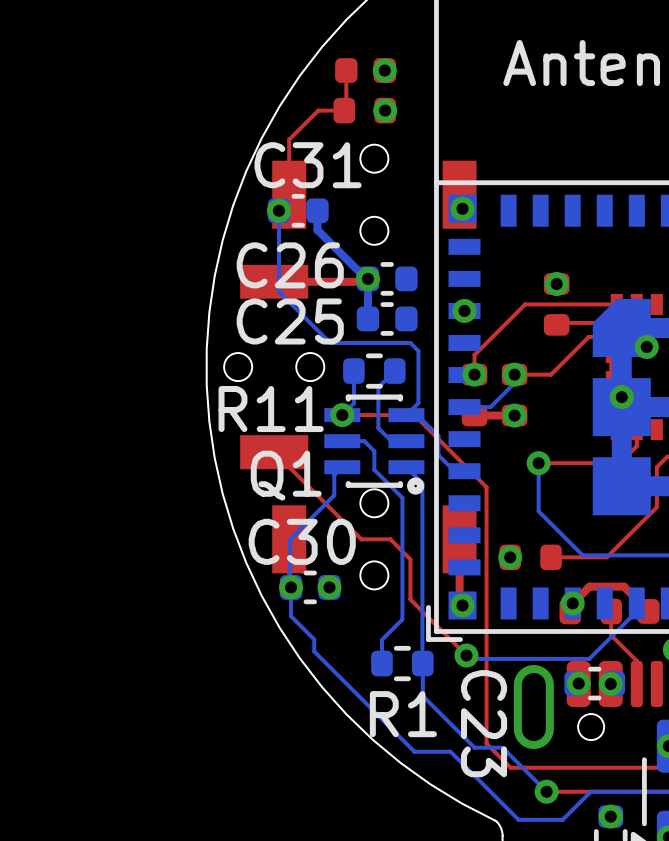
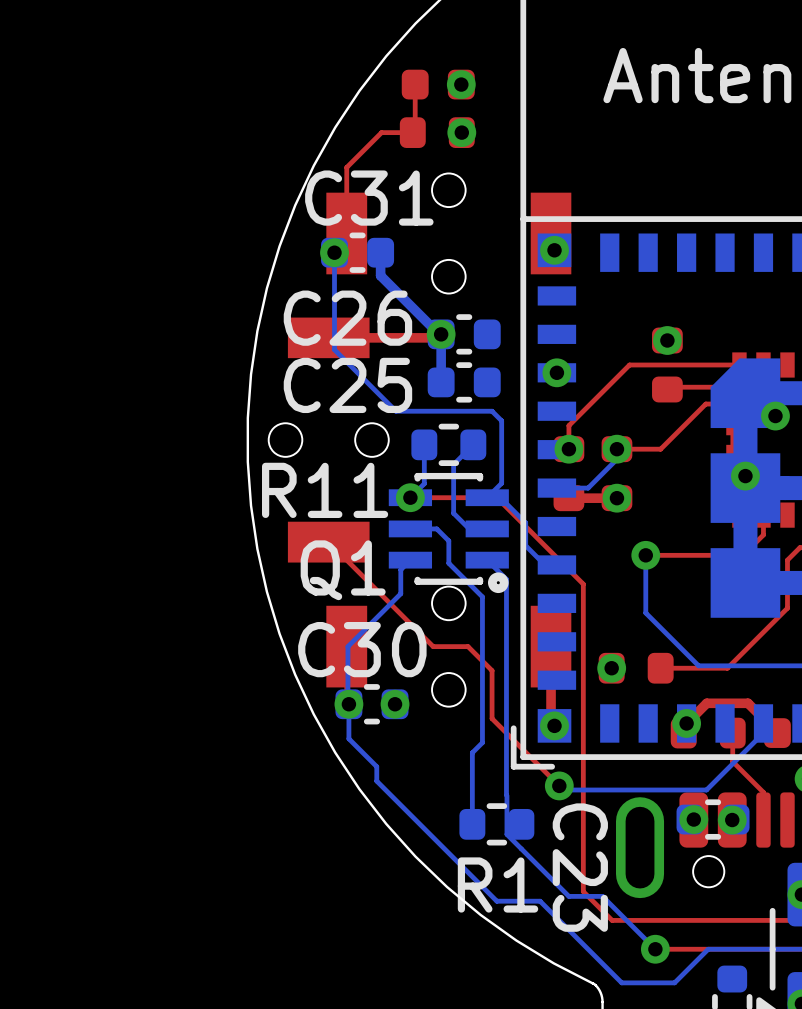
bottom track: (394, 627) (381, 639) (381, 663) -> (472, 752) (472, 824)
R1 position: (402, 663) -> (496, 824)
via: (610, 816) -> none

